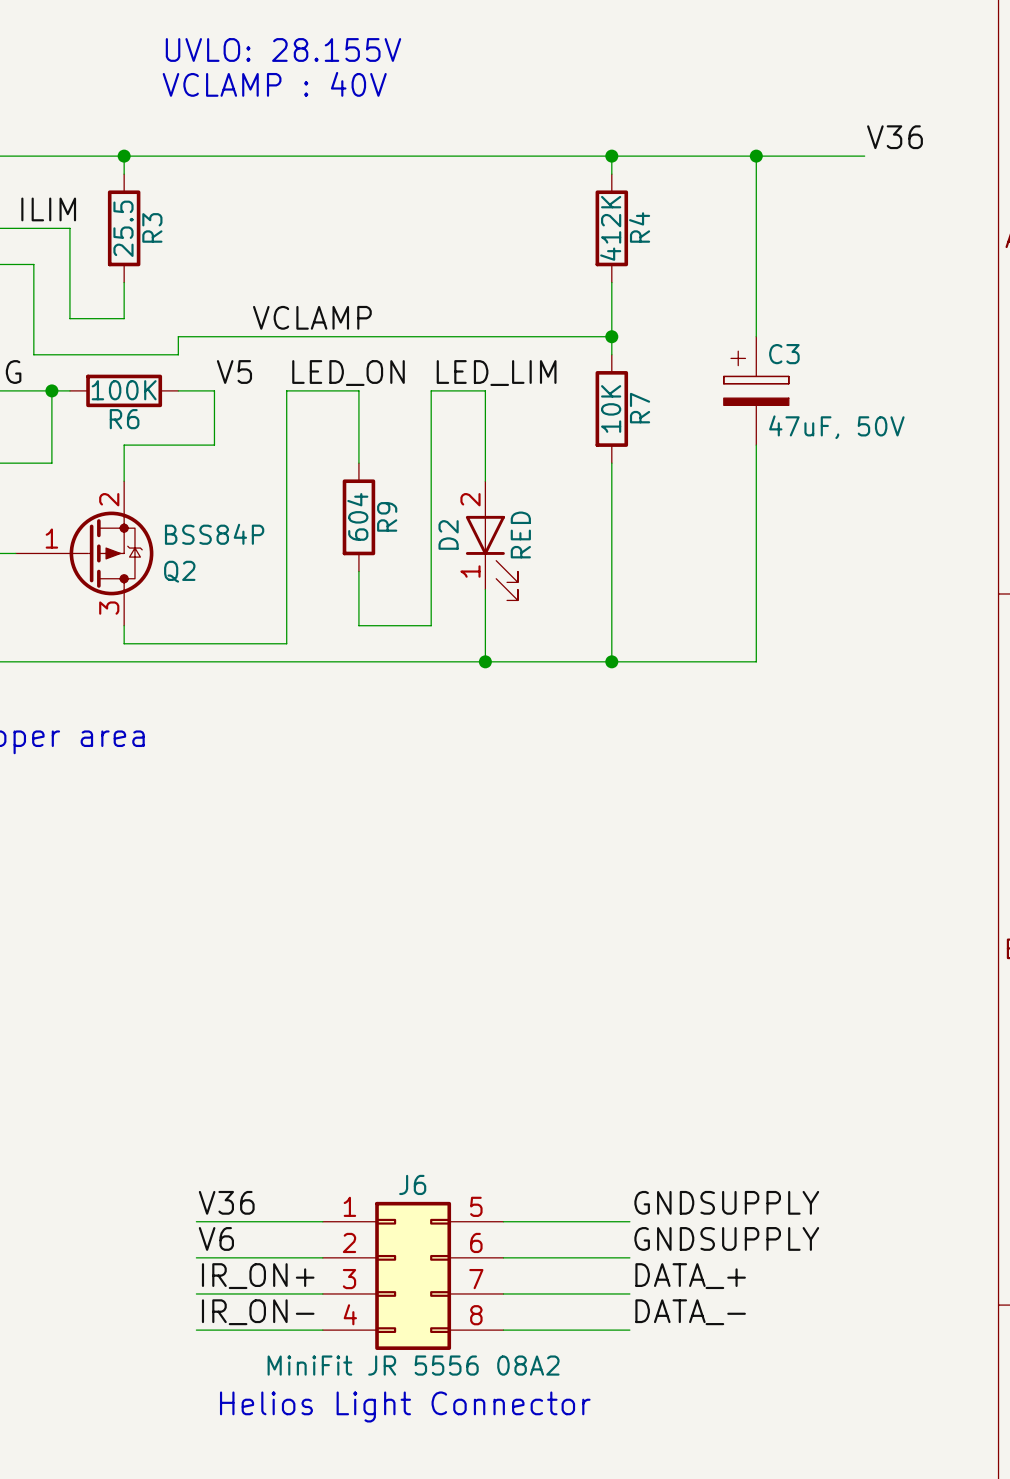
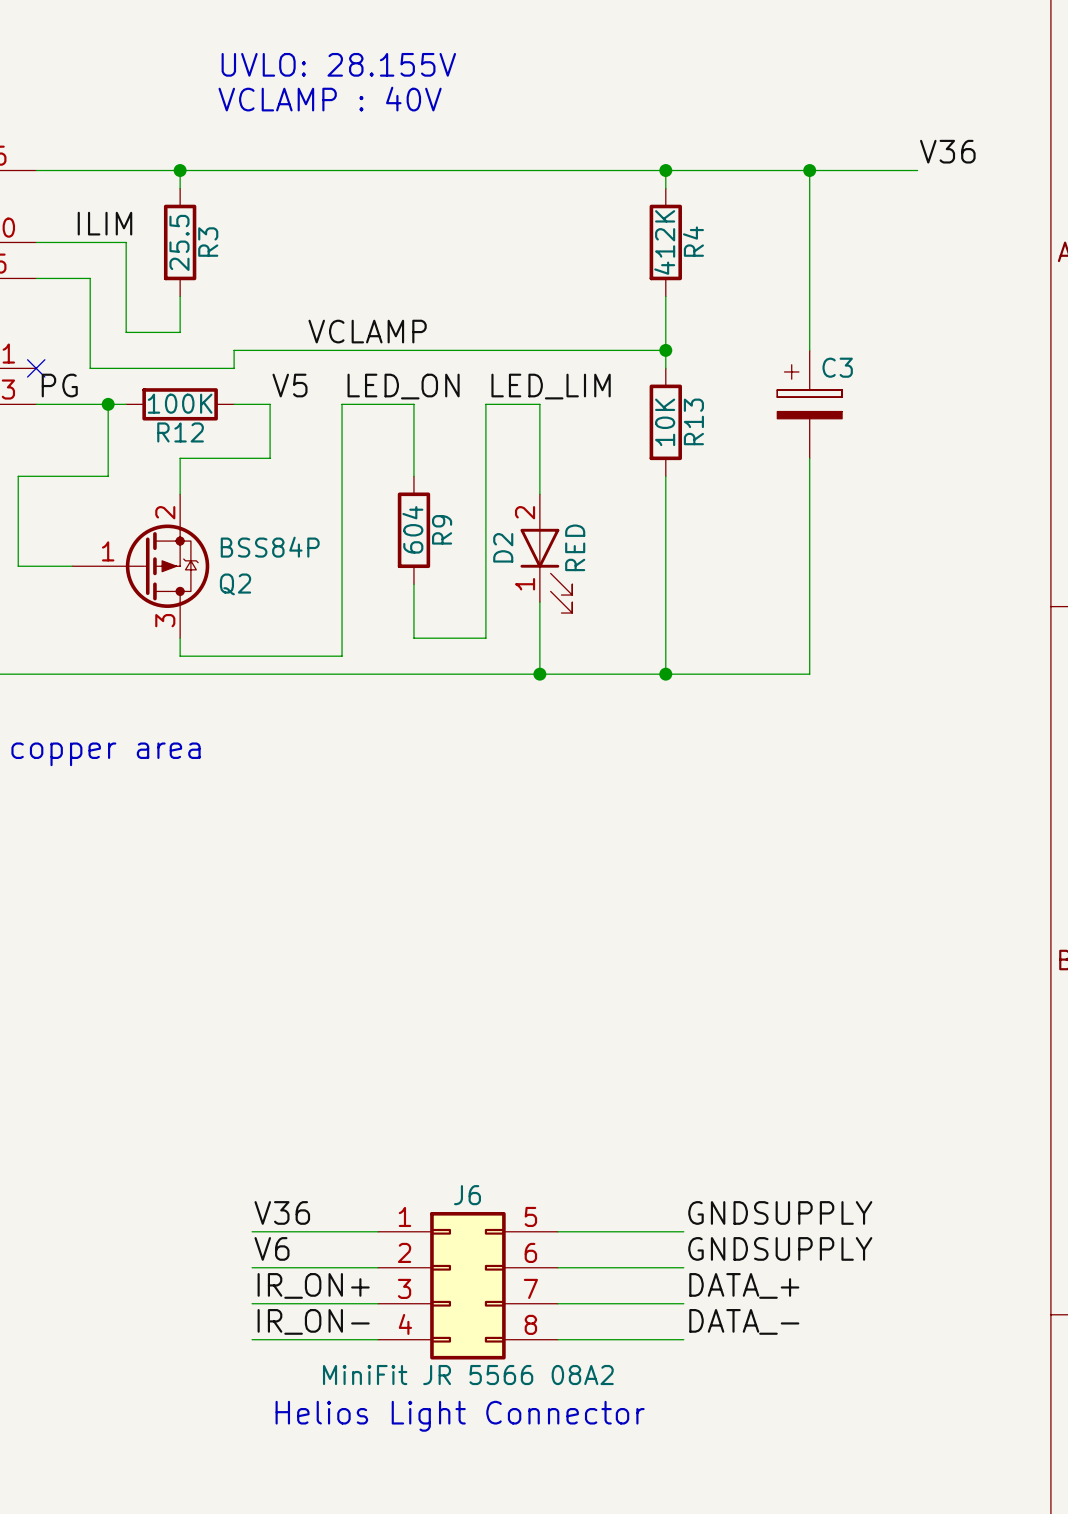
R7 name: R7 (640, 408) -> R13 (693, 421)
R6 name: R6 (124, 419) -> R12 (180, 432)
C3 value: 47uF, 50V (836, 427) -> none
J6 value: MiniFit JR 5556 08A2 (413, 1365) -> MiniFit JR 5566 08A2 (468, 1375)

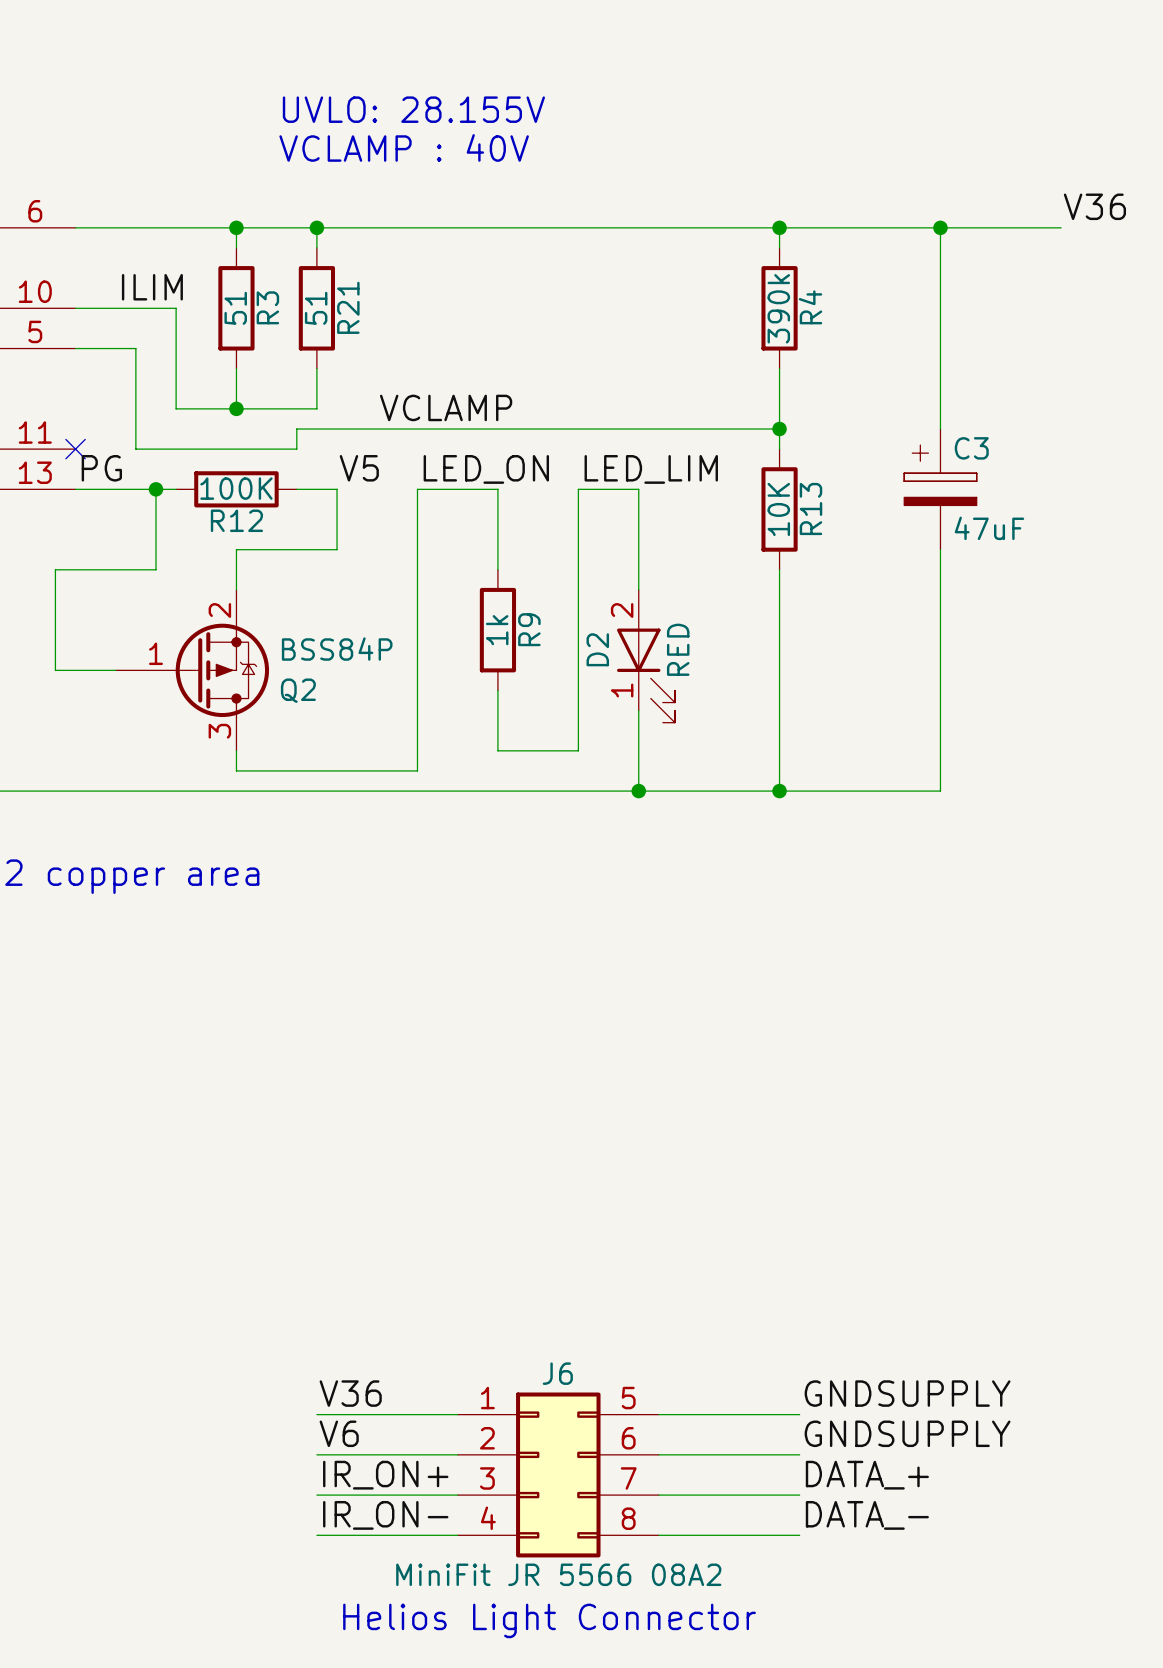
wire: none -> (316, 227) (316, 247)
junction: none -> (316, 227)
R3 value: 25.5 (179, 242) -> 51 (235, 308)
R21: none -> 51 (316, 308)
R4 value: 412K (664, 242) -> 390k (778, 308)
wire: none -> (316, 368) (316, 408) (236, 408)
junction: none -> (236, 408)
C3 value: none -> 47uF (989, 528)
R9 value: 604 (412, 529) -> 1k (497, 630)

